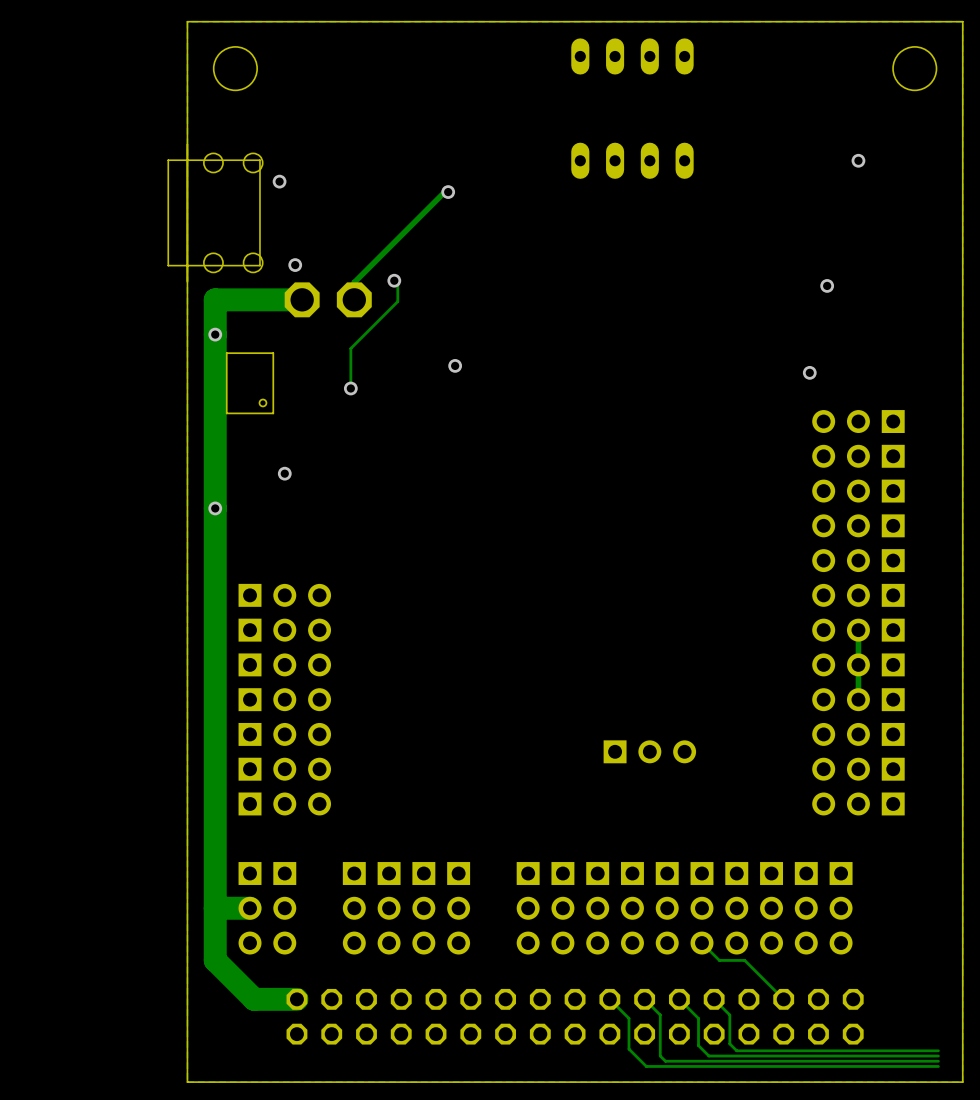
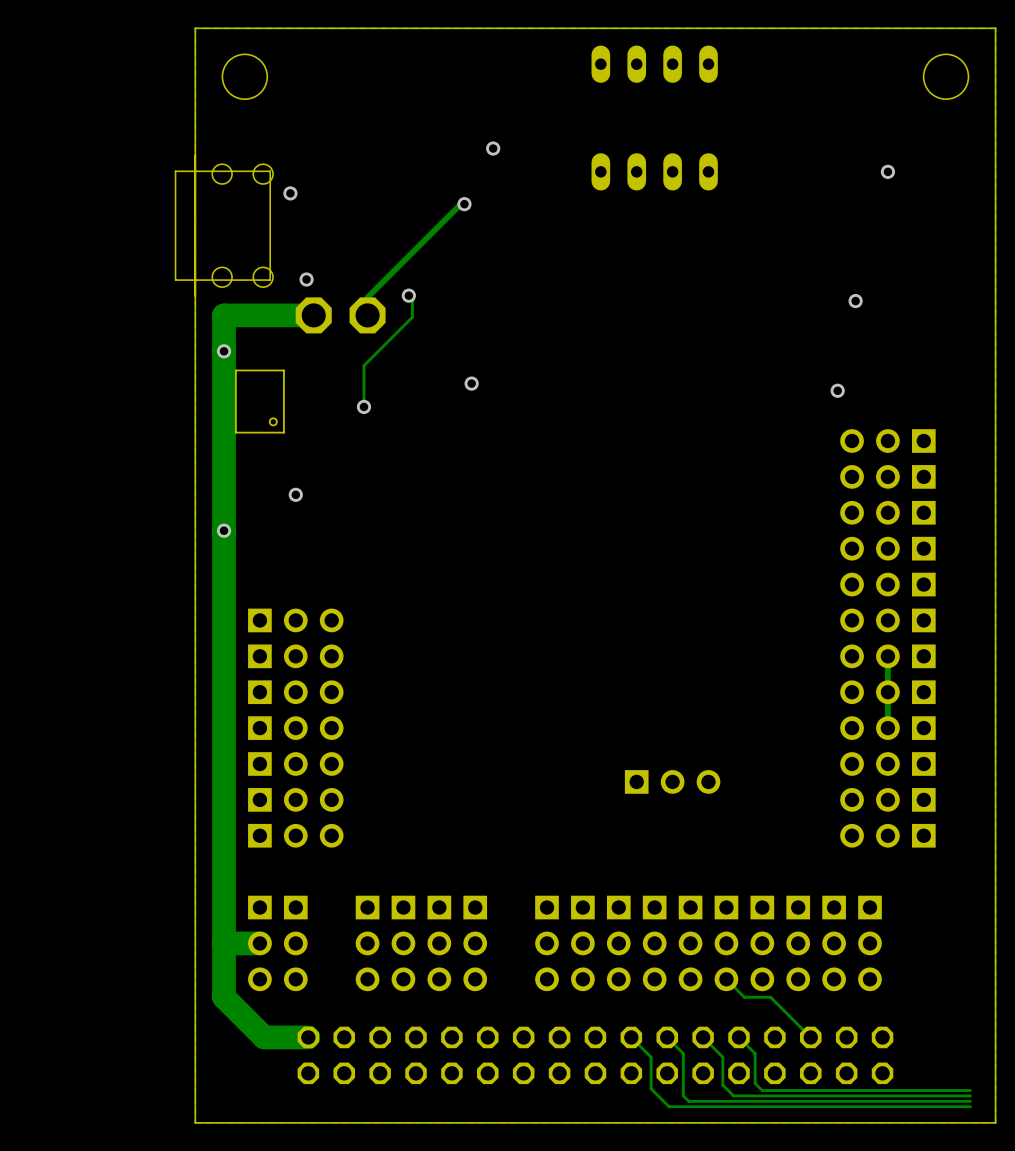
via: none -> (493, 148)

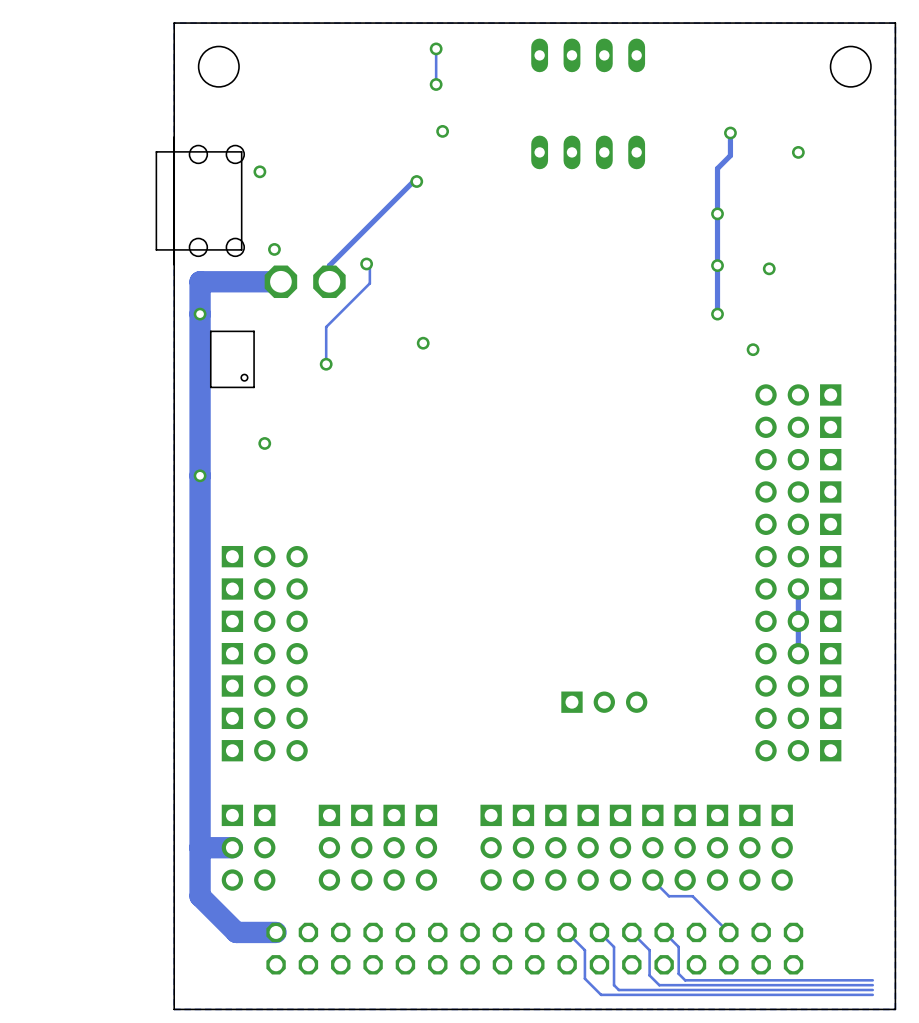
track: none -> (436, 48) (436, 84)
via: none -> (436, 48)
via: none -> (436, 84)
track: none -> (730, 133) (730, 155) (717, 168) (717, 314)
via: none -> (730, 133)
via: none -> (717, 213)
via: none -> (717, 265)
via: none -> (717, 314)

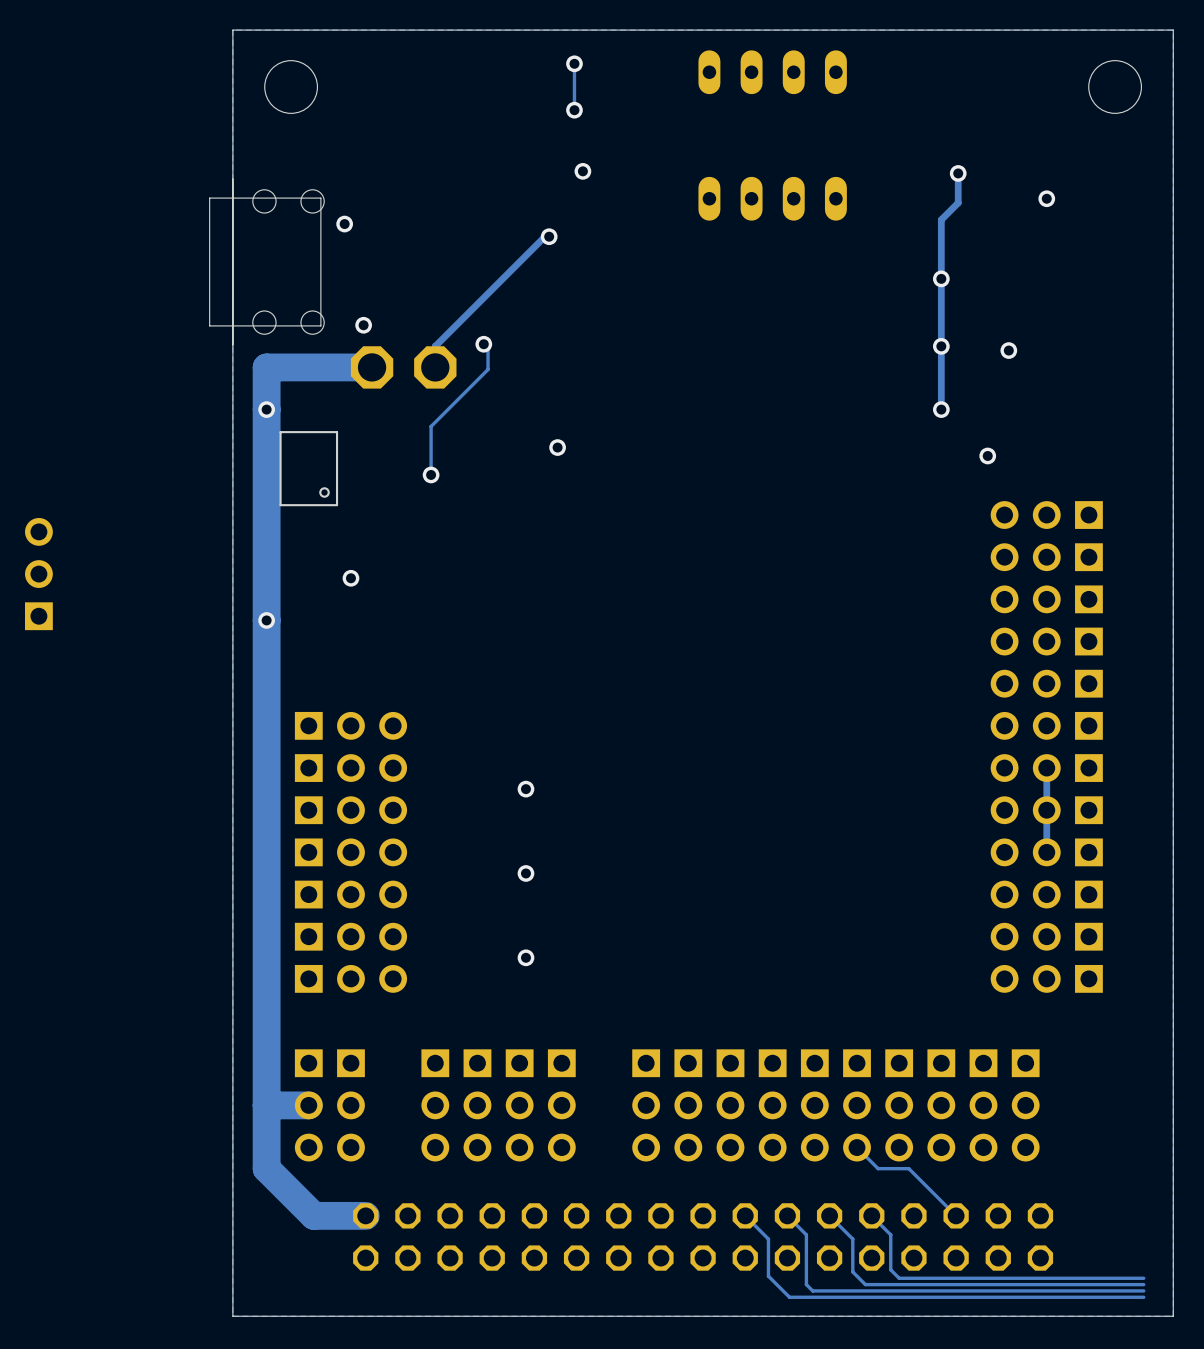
part: none -> (38, 574)
via: none -> (525, 789)
via: none -> (525, 873)
part: (604, 702) -> none
via: none -> (525, 957)

